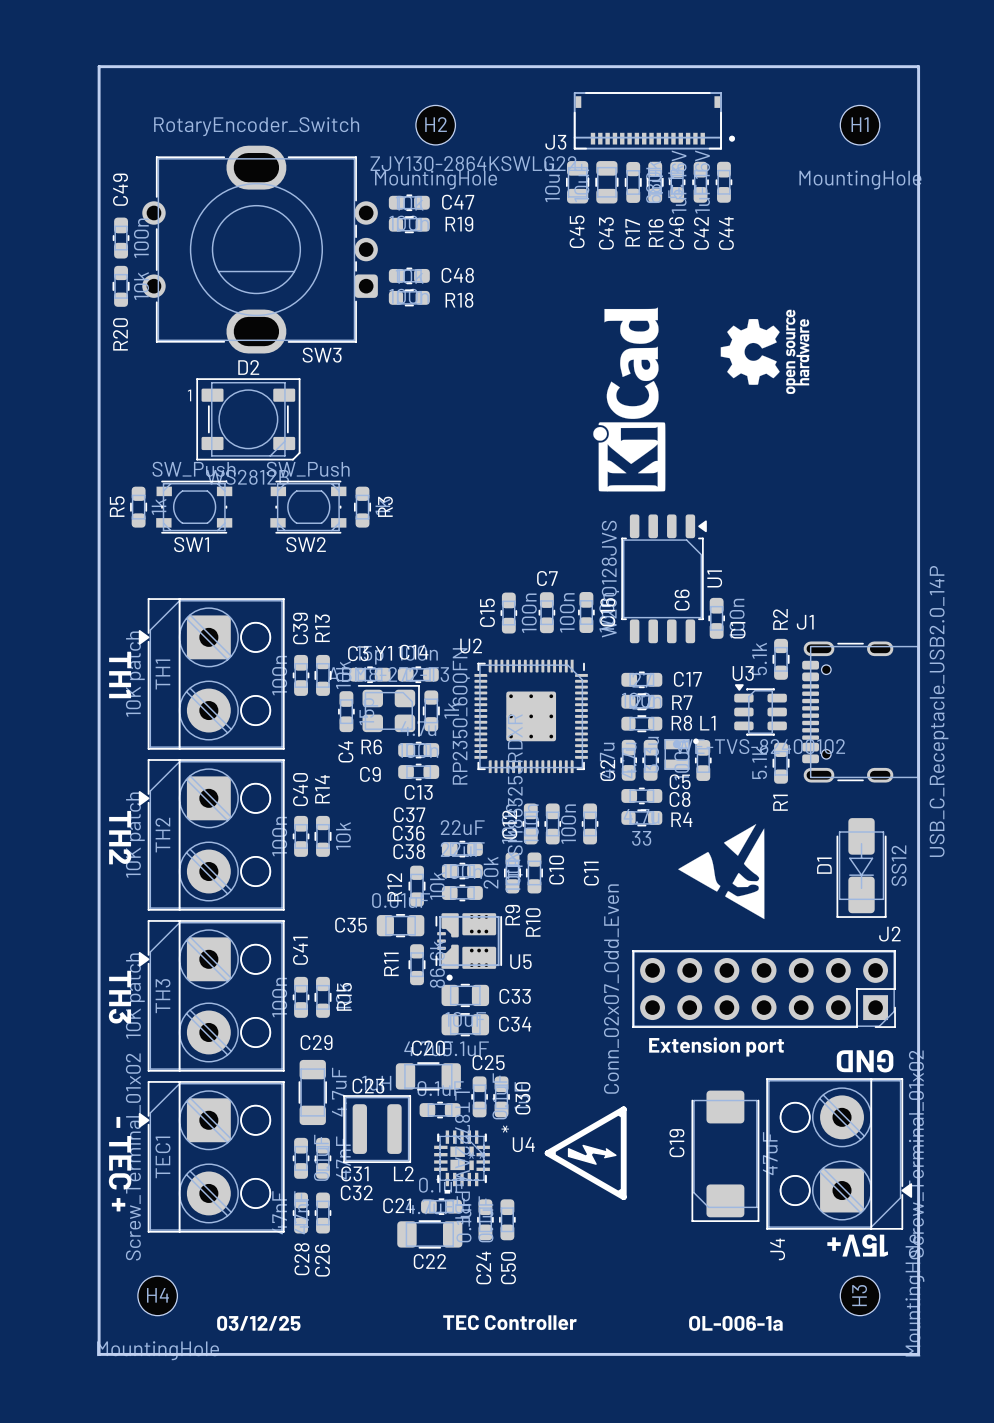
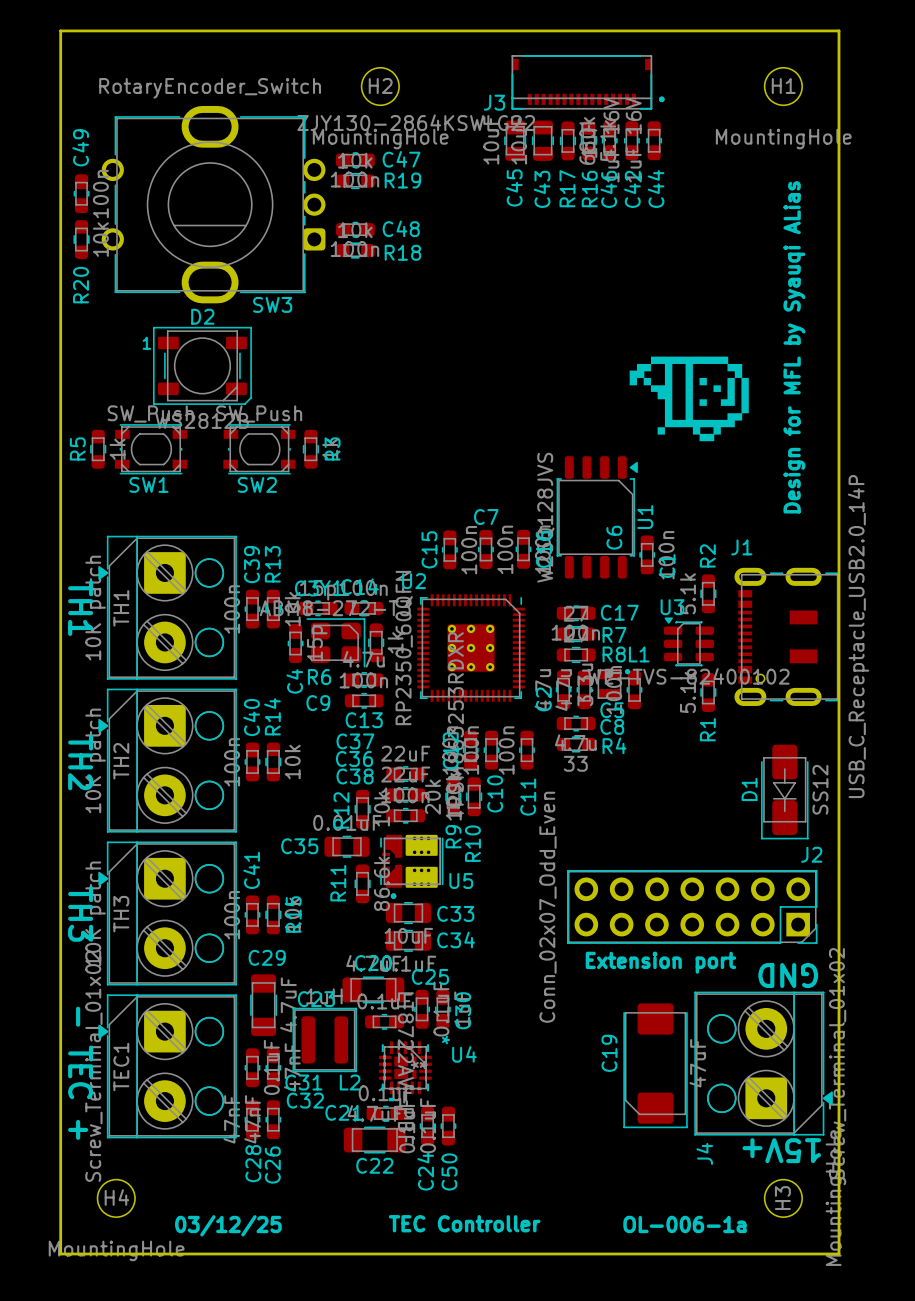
drawing: [593, 307, 666, 492] -> none
drawing: [720, 309, 810, 395] -> none
drawing: none -> [629, 356, 749, 442]
text: none -> Design for MFL by Syauqi ALias (794, 347)
J1 footprint: [802, 641, 919, 783] -> [734, 567, 840, 706]
drawing: [678, 824, 765, 920] -> none
drawing: [544, 1106, 627, 1201] -> none

